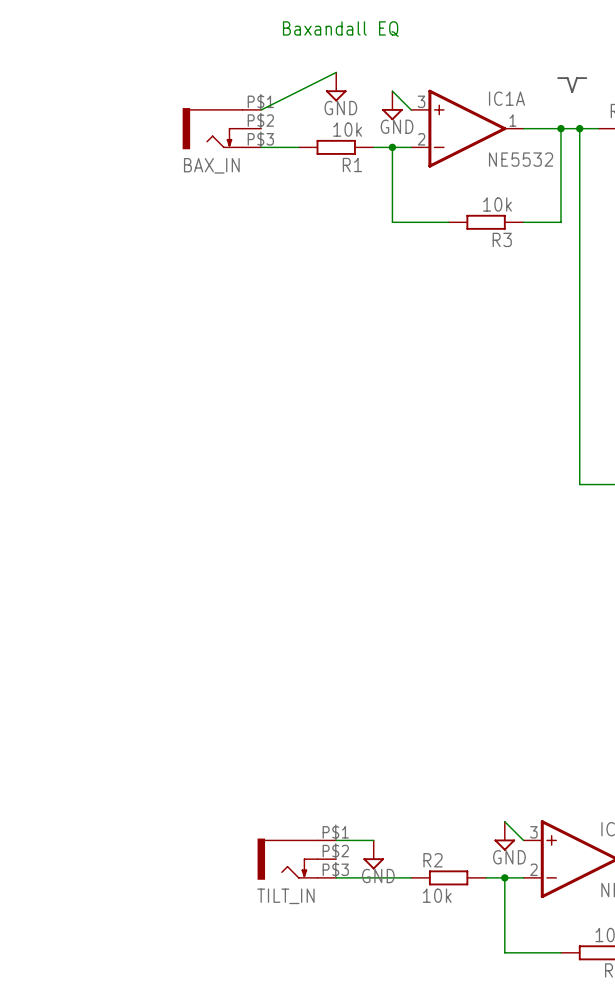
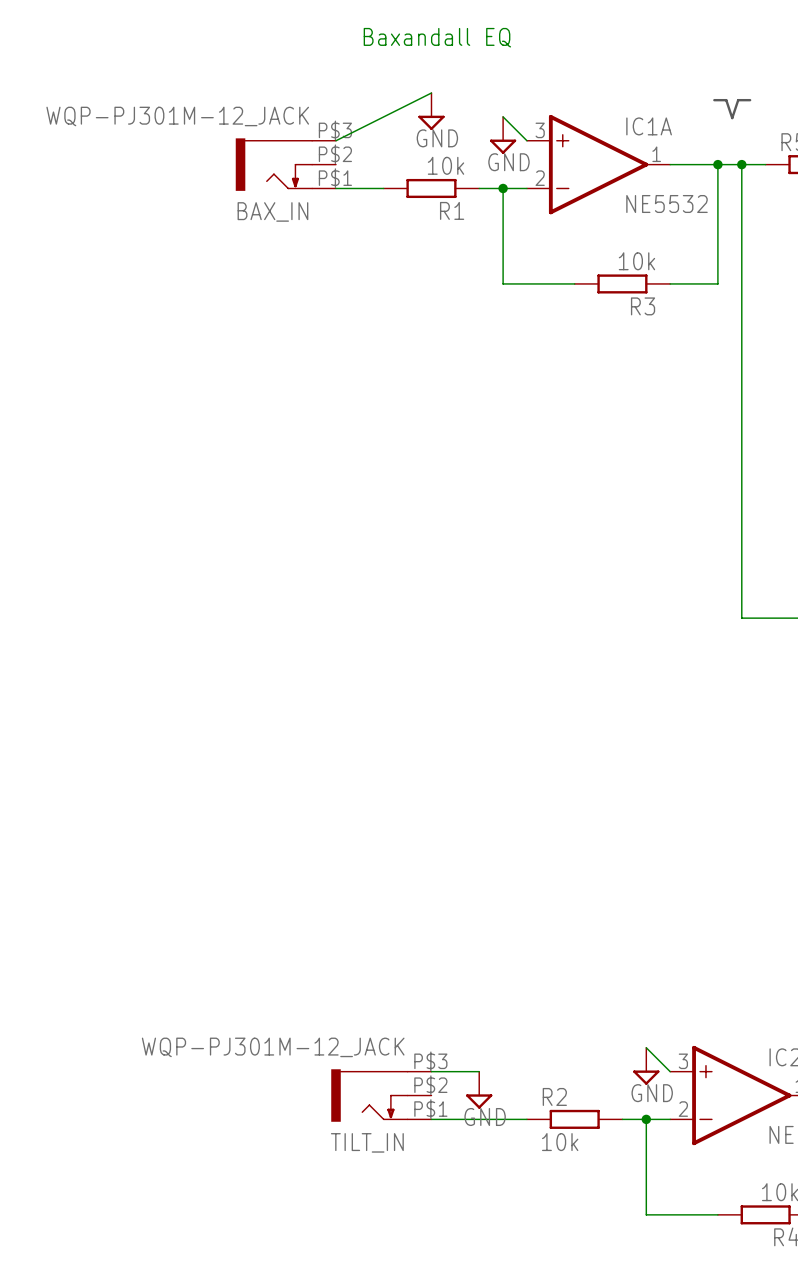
BAX_IN value: none -> WQP-PJ301M-12_JACK (177, 116)
BAX_IN pin number: P$1 (260, 101) -> P$3 (335, 130)
BAX_IN pin number: P$3 (260, 139) -> P$1 (335, 178)
TILT_IN value: none -> WQP-PJ301M-12_JACK (273, 1047)
TILT_IN pin number: P$1 (335, 832) -> P$3 (430, 1061)
TILT_IN pin number: P$3 (335, 869) -> P$1 (430, 1109)

